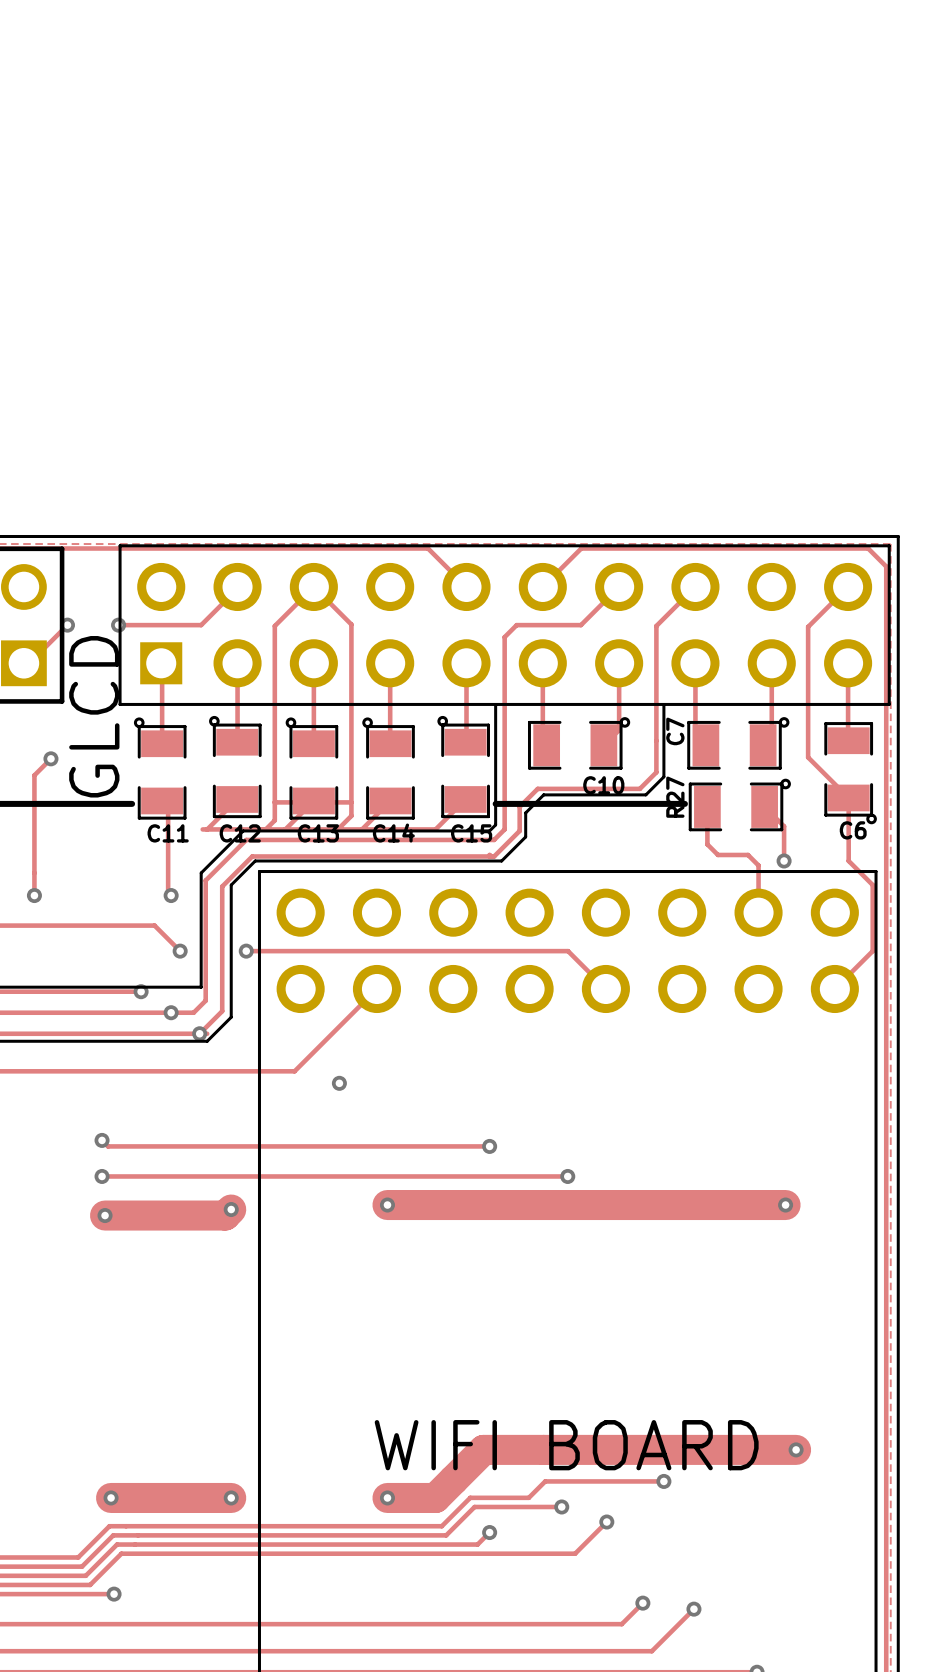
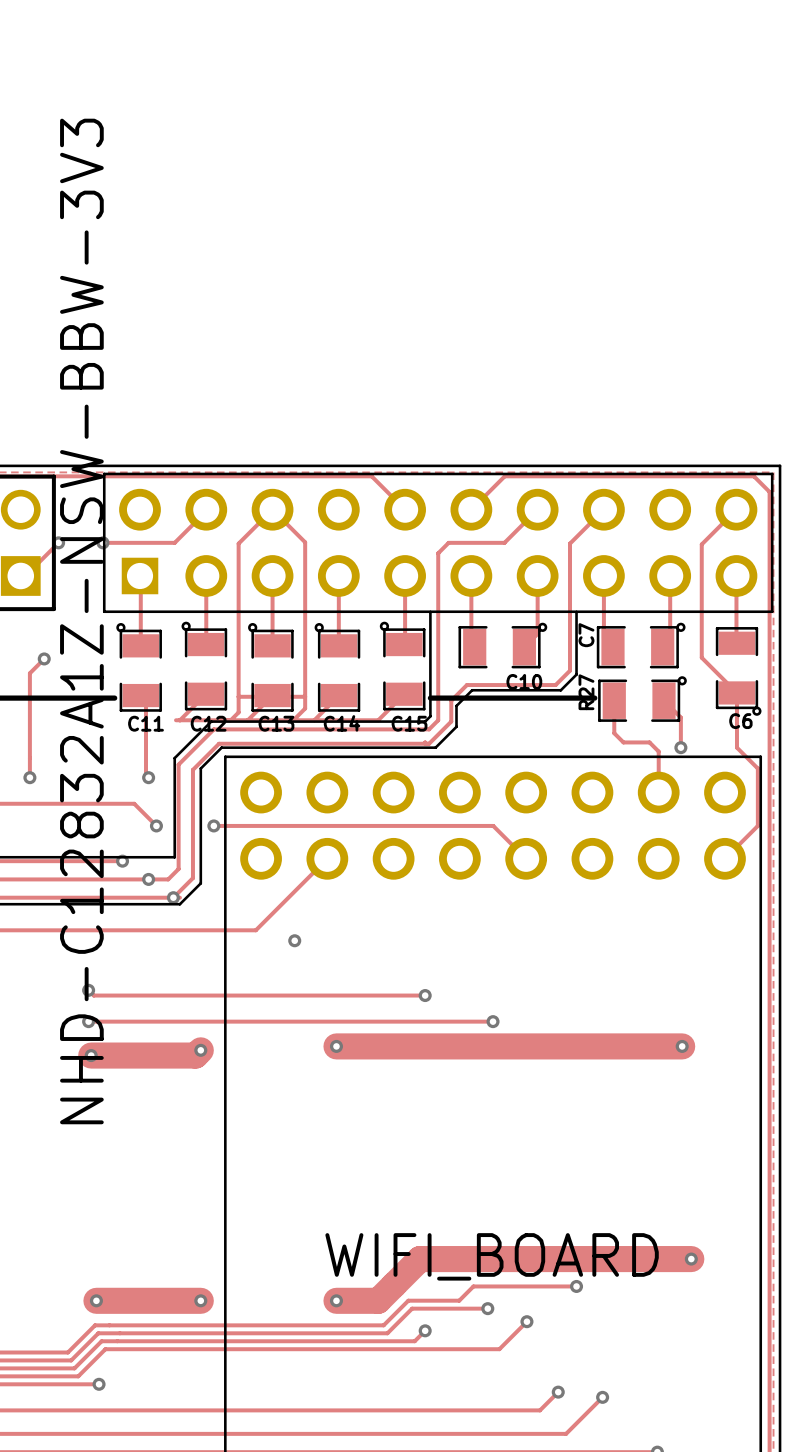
part value: GLCD (94, 716) -> NHD-C12832A1Z-NSW-BBW-3V3 (81, 621)
part value: WIFI BOARD (566, 1445) -> WIFI_BOARD (492, 1256)

